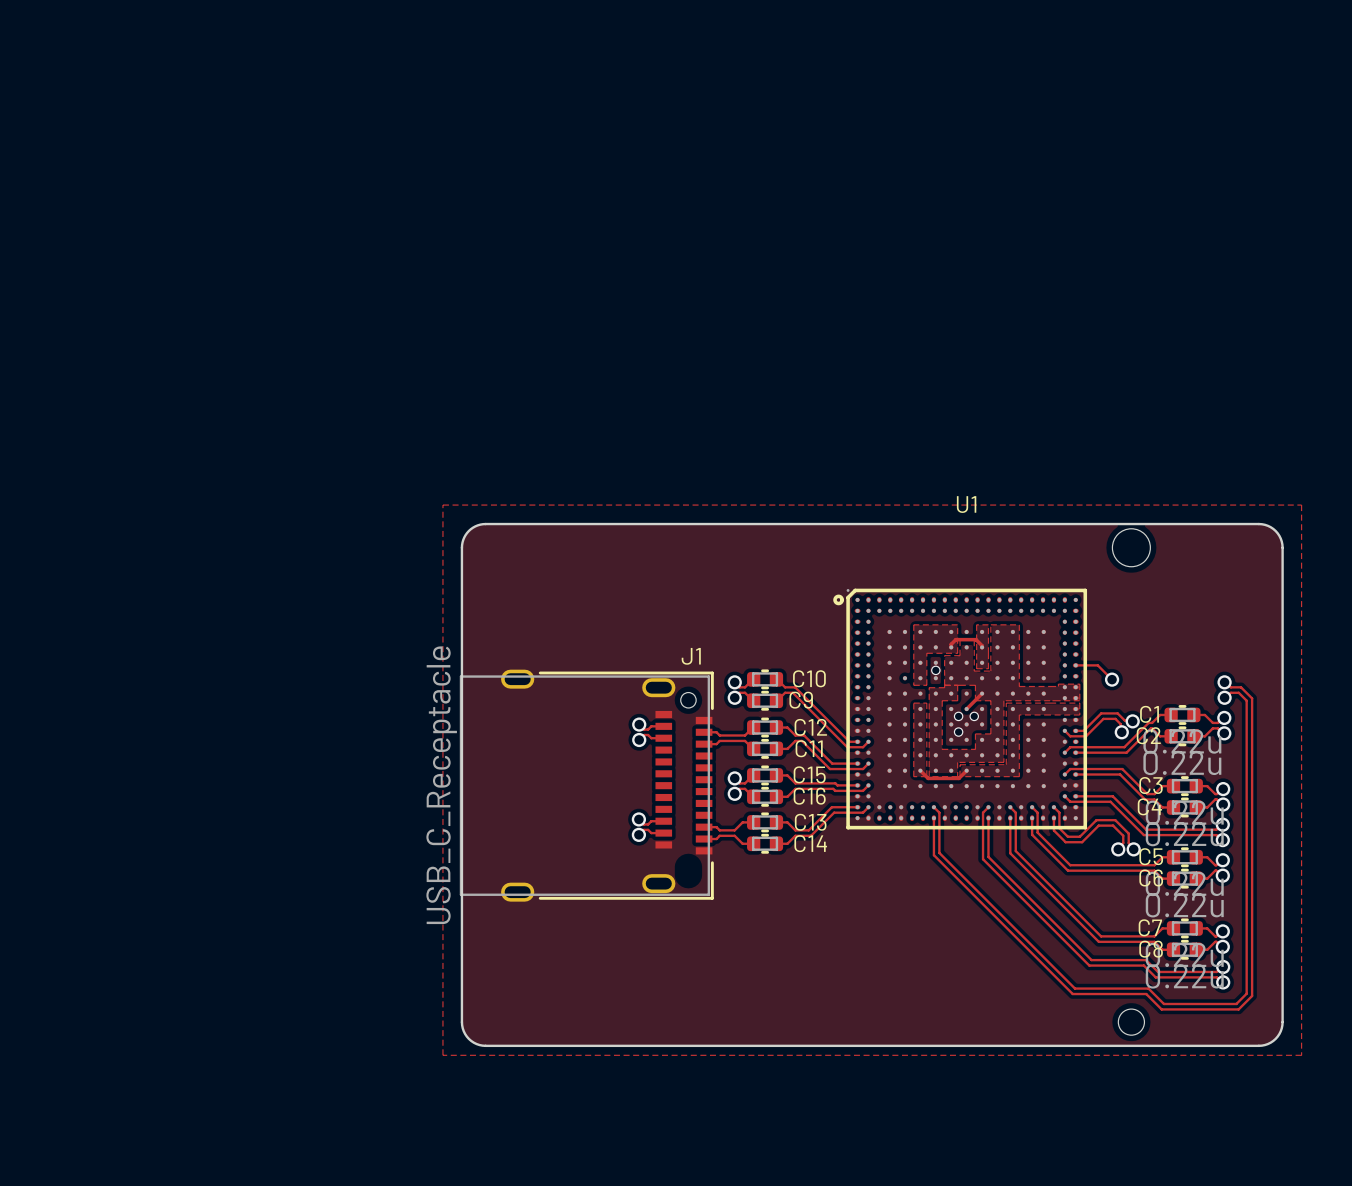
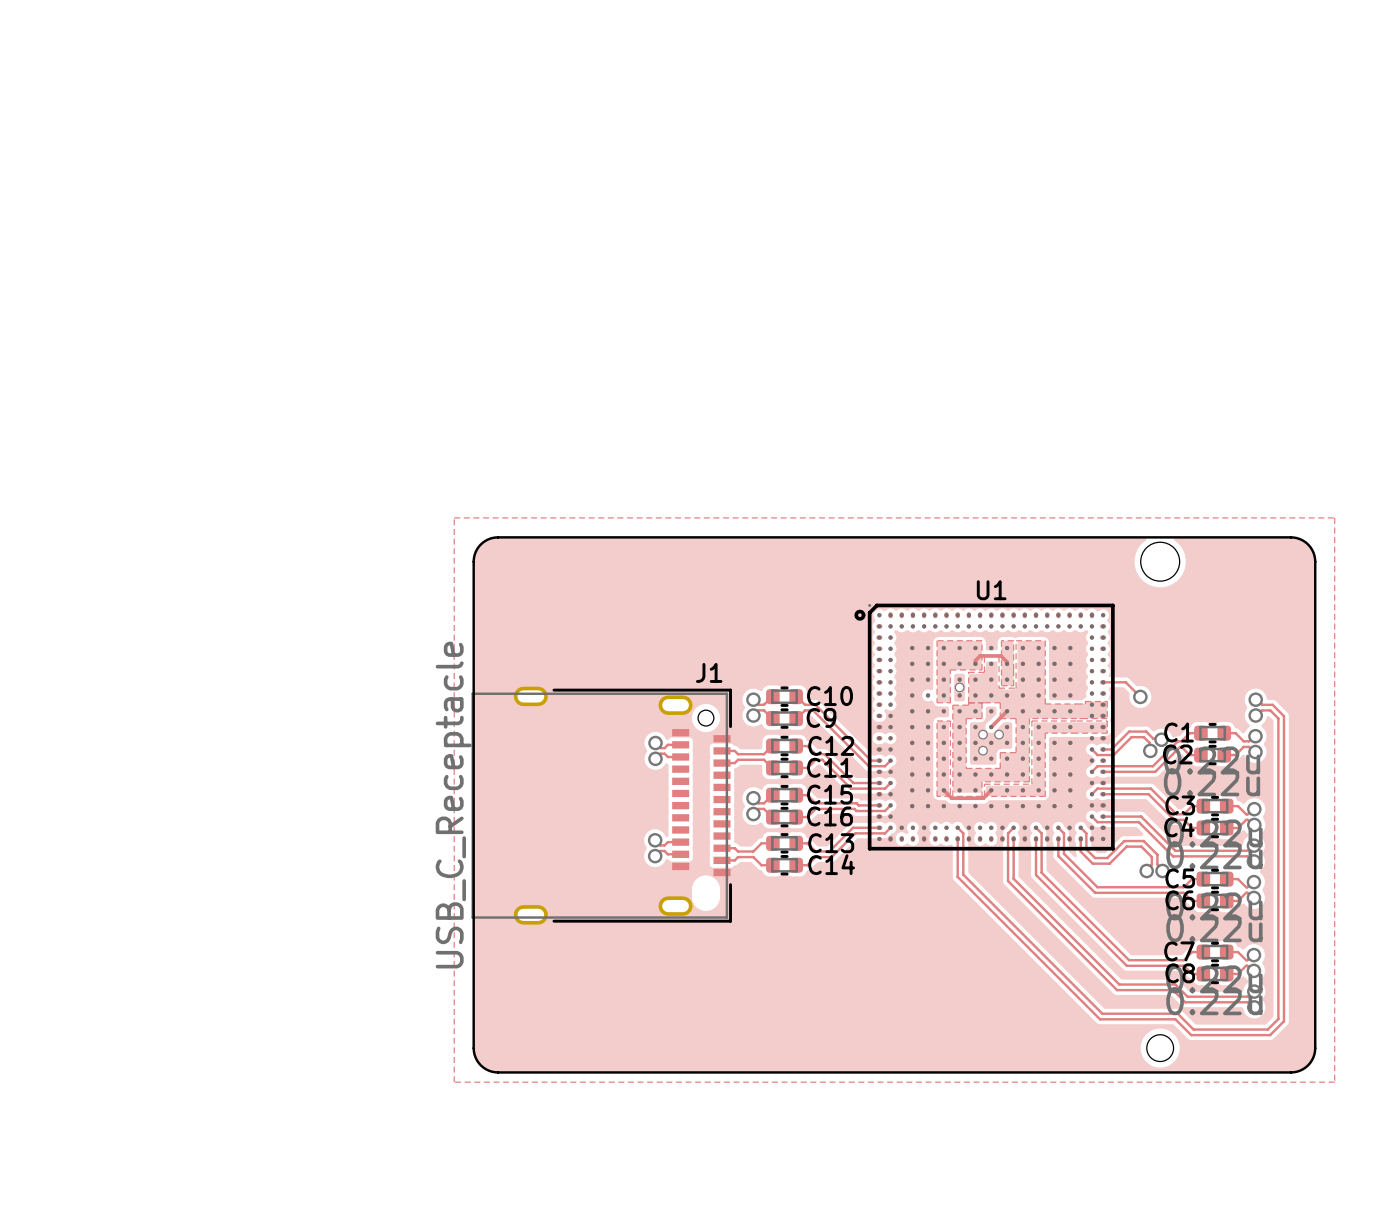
U1 name position: U1 (966, 504) -> U1 (991, 590)

